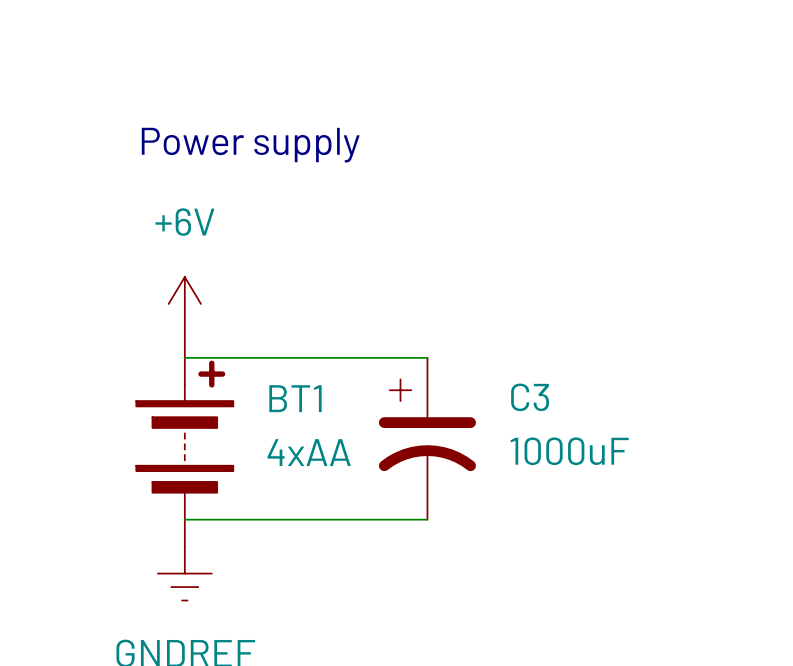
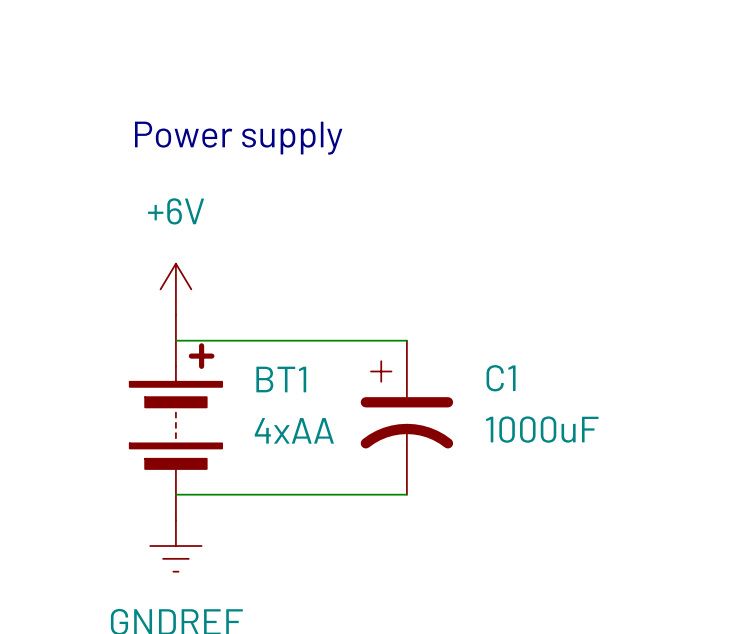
C3 name: C3 (530, 397) -> C1 (501, 378)

